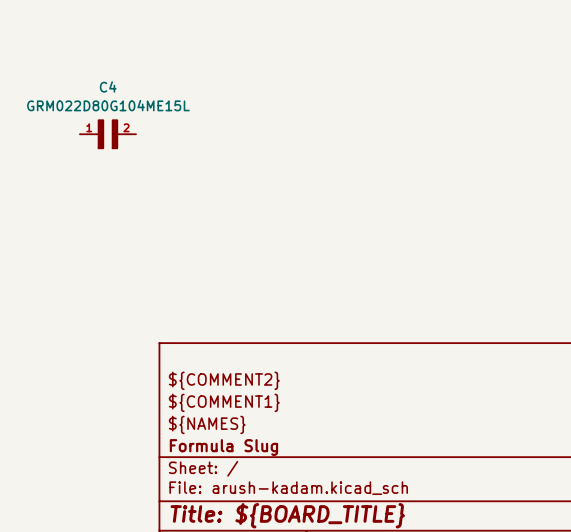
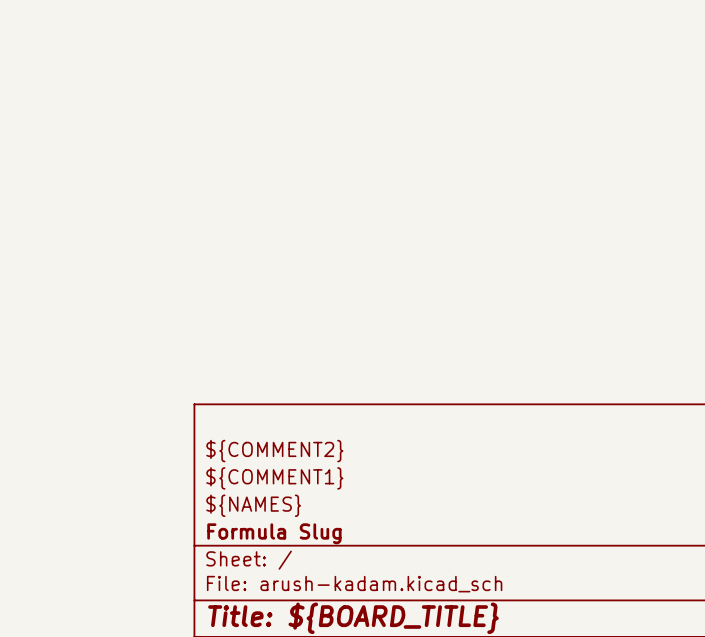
C4: GRM022D80G104ME15L (107, 134) -> none

